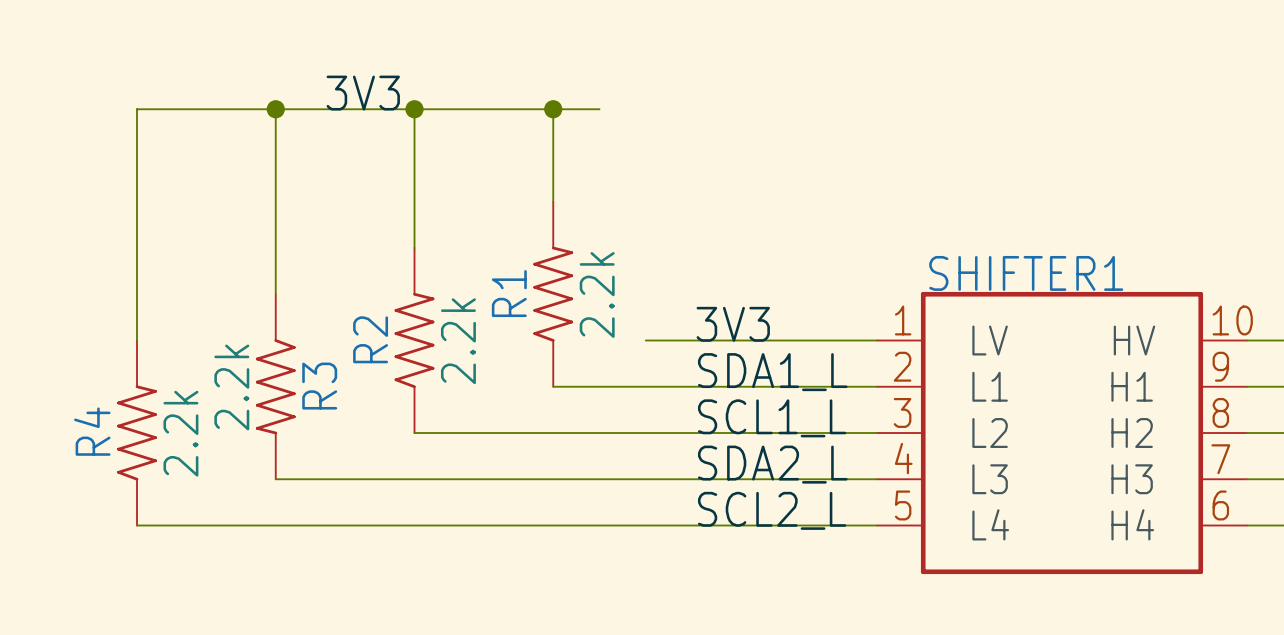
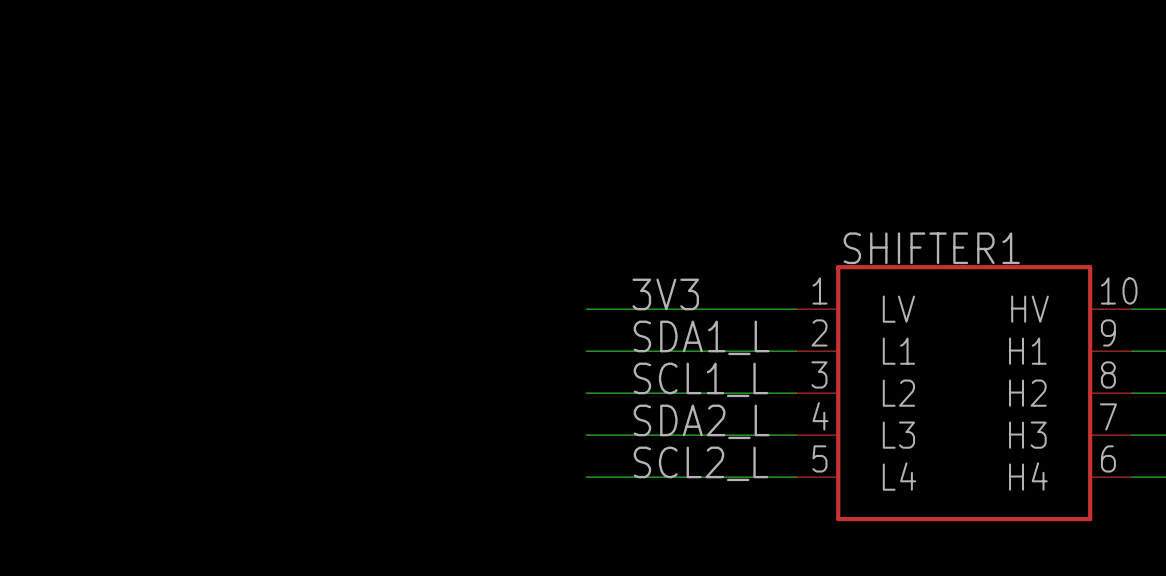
label: 3V3 (363, 93) -> none
wire: (275, 109) (275, 294) -> none
junction: (275, 109) -> none
wire: (414, 109) (414, 248) -> none
junction: (414, 109) -> none
wire: (553, 109) (553, 201) -> none
junction: (553, 109) -> none
wire: (599, 109) (137, 109) (137, 340) -> none
R1: 2.2k (553, 294) -> none
R2: 2.2k (414, 340) -> none
R3: 2.2k (275, 386) -> none
wire: (553, 386) (645, 386) -> none
R4: 2.2k (137, 433) -> none
wire: (414, 433) (645, 433) -> none
wire: (275, 479) (645, 479) -> none
wire: (137, 525) (645, 525) -> none

